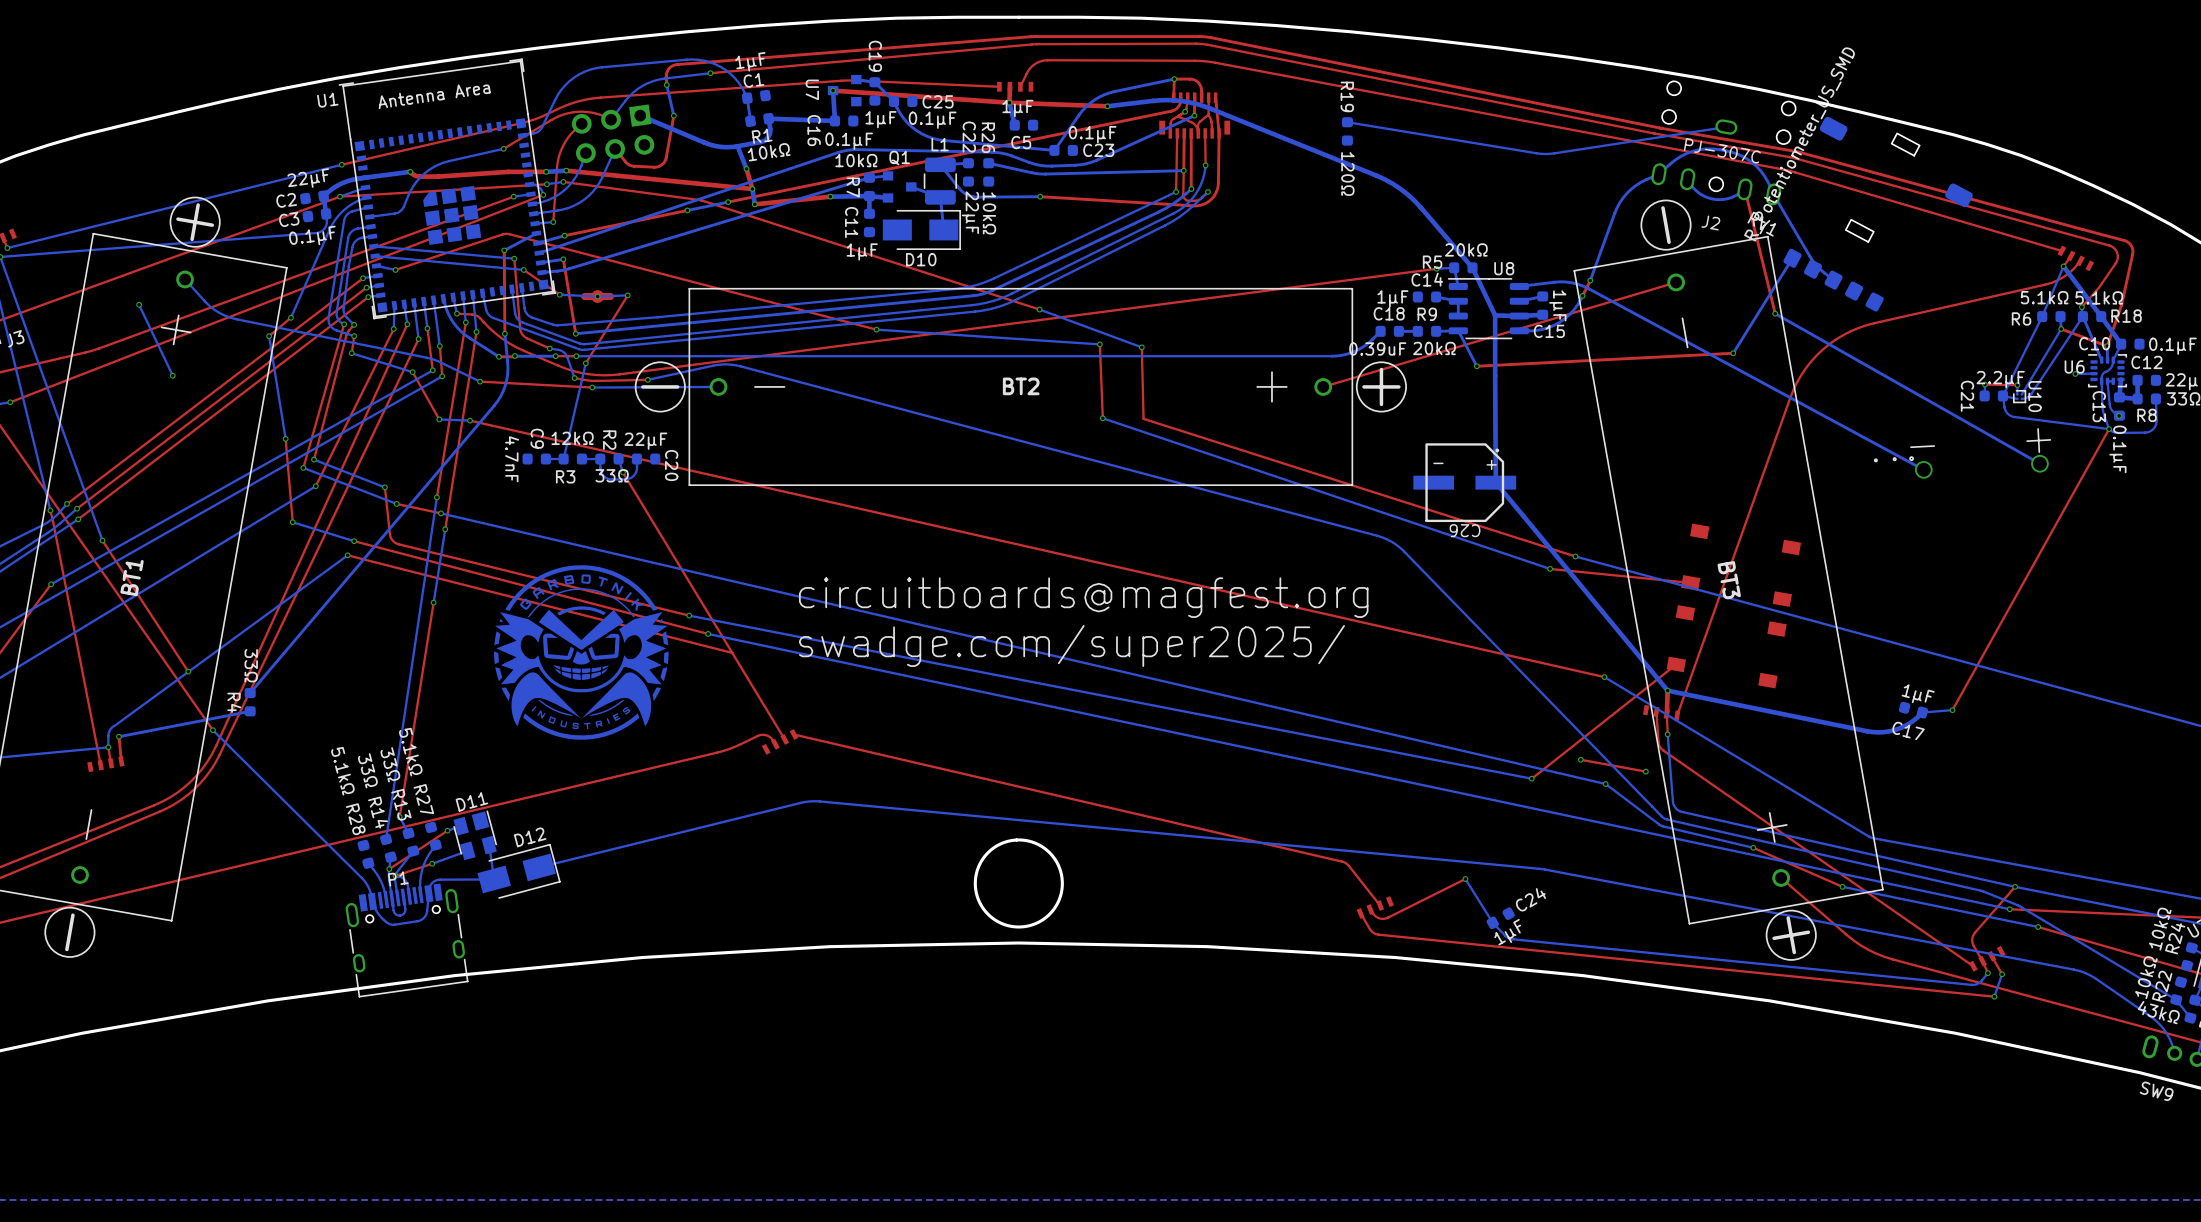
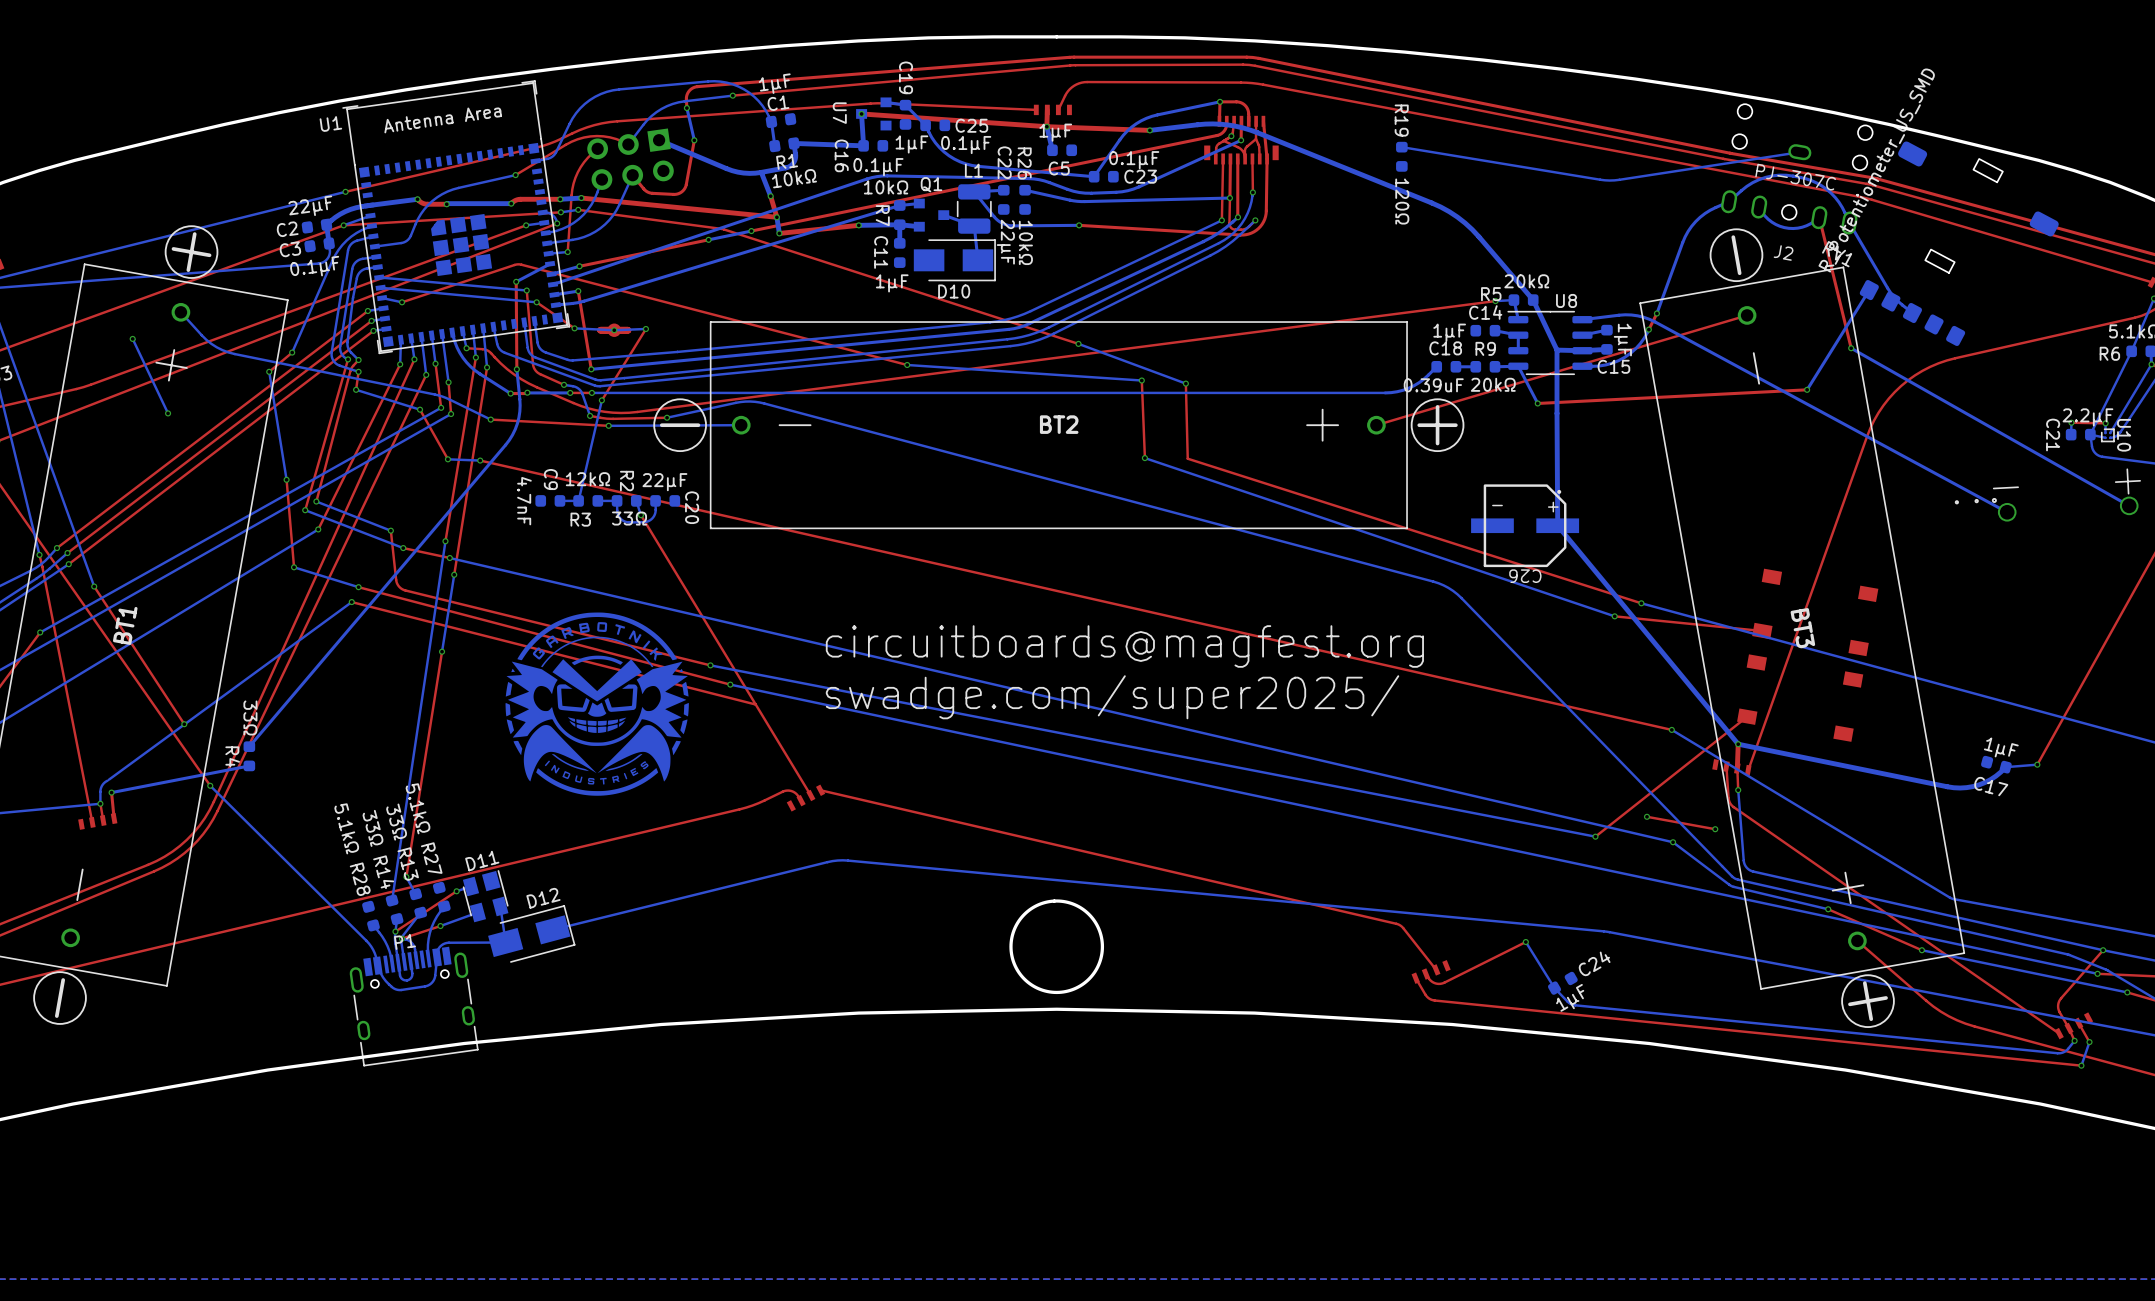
top track: (508, 171) (438, 176) -> (520, 199) (511, 203)
via: none -> (446, 204)
bottom track: none -> (511, 203) (446, 204)
via: none -> (511, 203)

